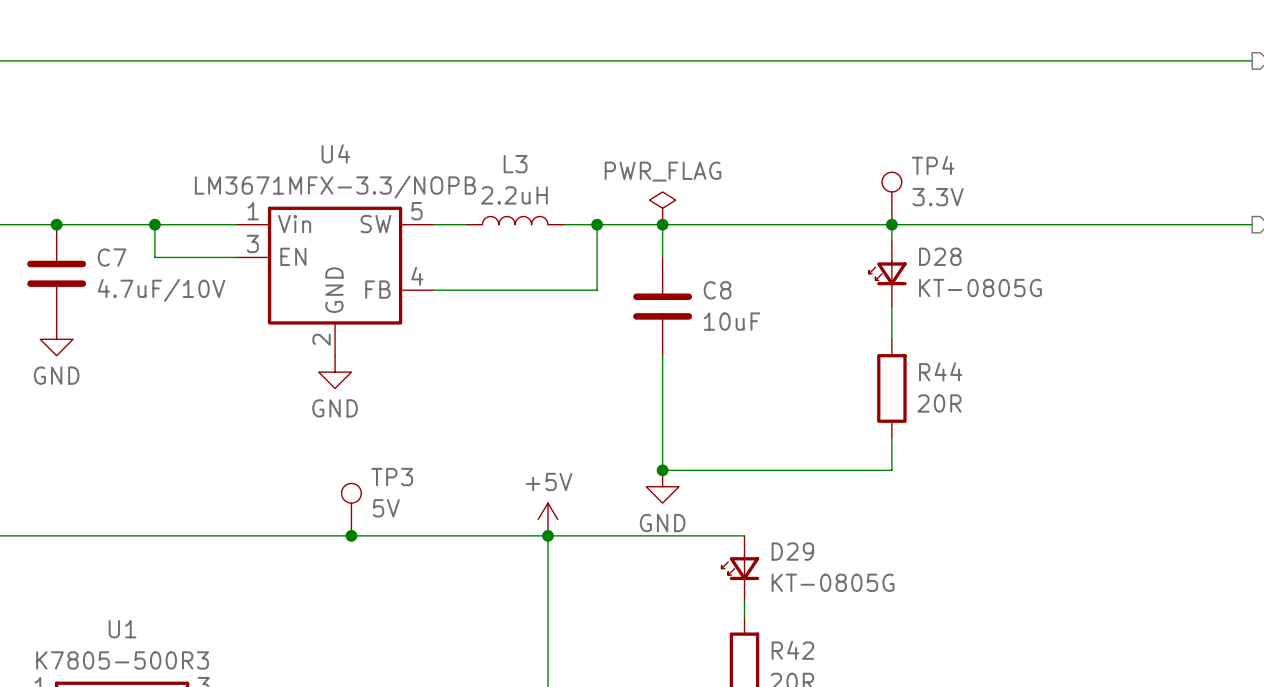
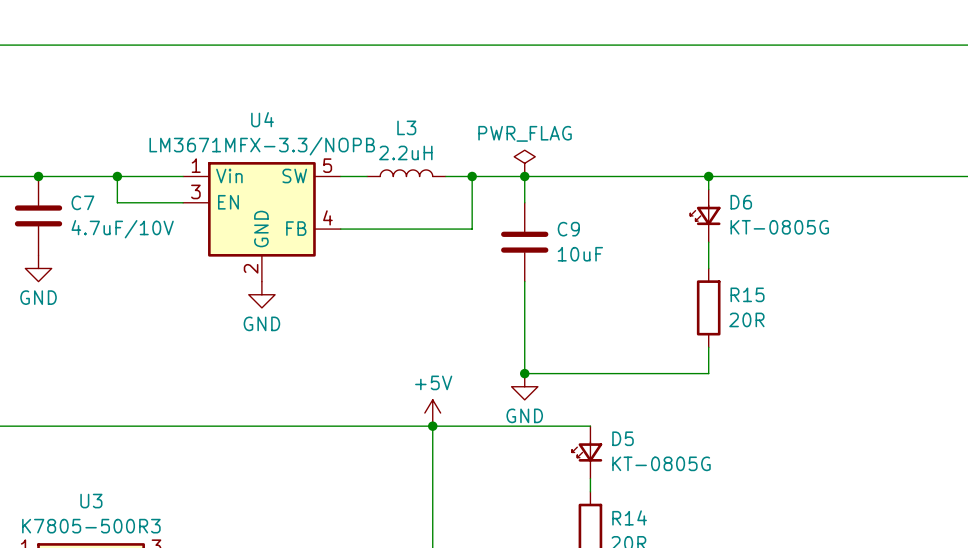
TP4: 3.3V (891, 198) -> none
D28 name: D28 (940, 256) -> D6 (741, 202)
C8 name: C8 (717, 290) -> C9 (568, 229)
R44 name: R44 (940, 371) -> R15 (747, 294)
TP3: 5V (351, 509) -> none
junction: (351, 535) -> none
D29 name: D29 (792, 551) -> D5 (623, 438)
U1 name: U1 (122, 629) -> U3 (91, 501)
R42 name: R42 (792, 650) -> R14 (629, 517)

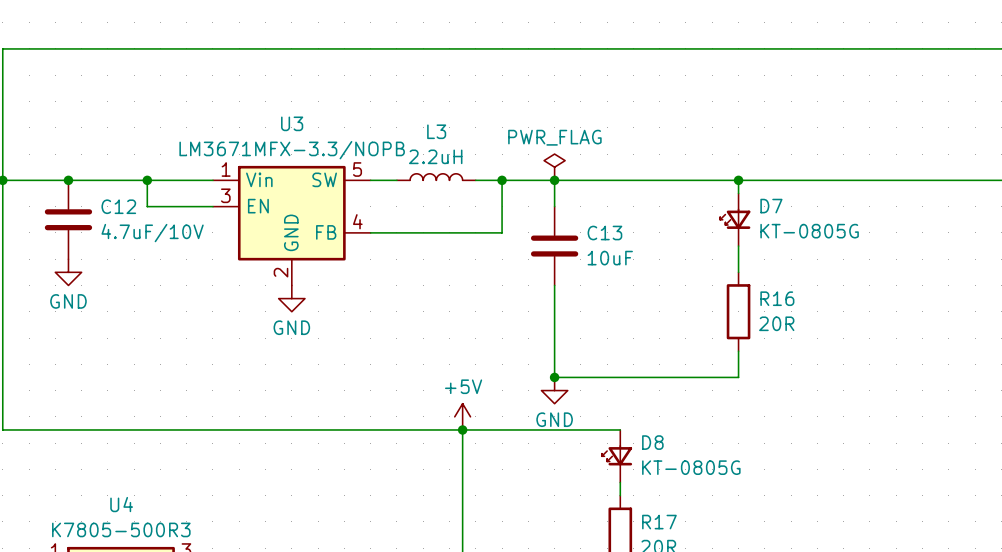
U4 name: U4 (262, 119) -> U3 (292, 123)
C7 name: C7 (82, 202) -> C12 (118, 206)
D6 name: D6 (741, 202) -> D7 (771, 206)
C9 name: C9 (568, 229) -> C13 (604, 233)
R15 name: R15 (747, 294) -> R16 (777, 298)
D5 name: D5 (623, 438) -> D8 (652, 442)
U3 name: U3 (91, 501) -> U4 (121, 504)
R14 name: R14 (629, 517) -> R17 (659, 522)

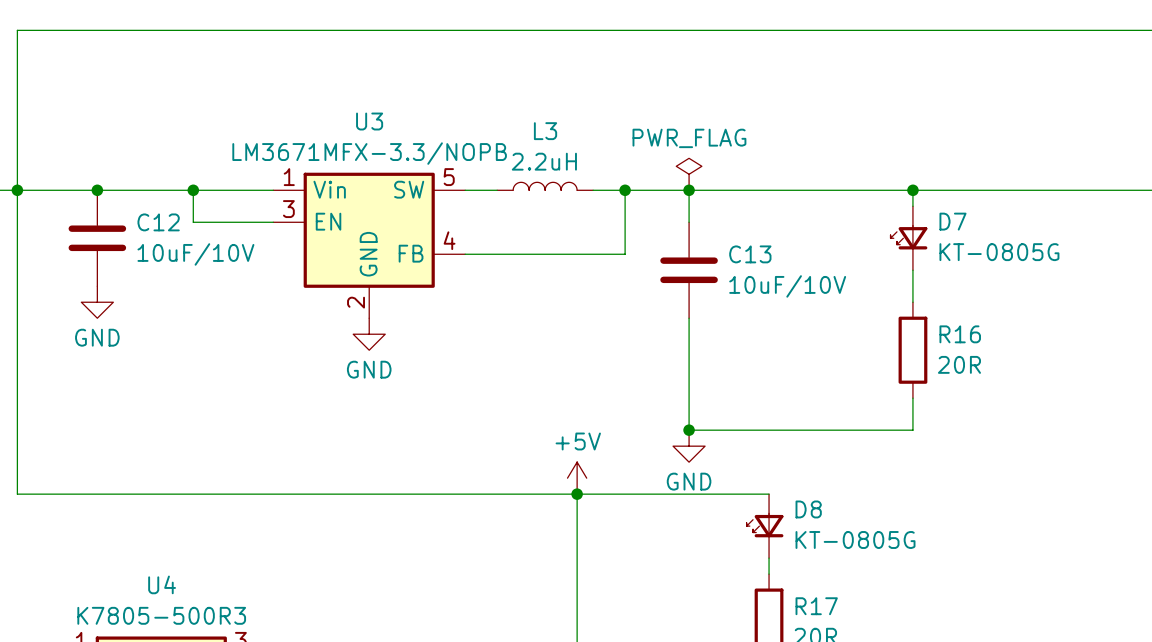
C12 value: 4.7uF/10V (152, 233) -> 10uF/10V (195, 254)
C13 value: 10uF (610, 258) -> 10uF/10V (787, 286)

